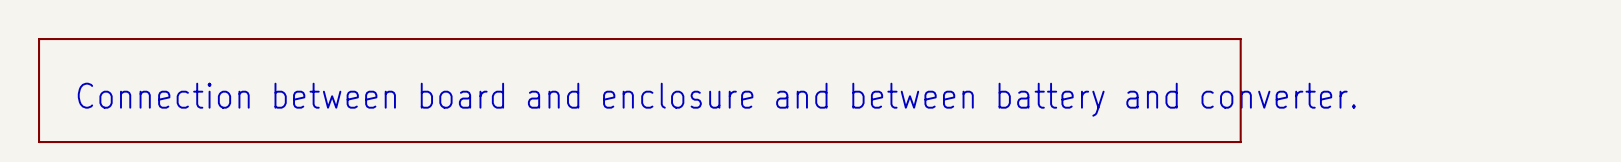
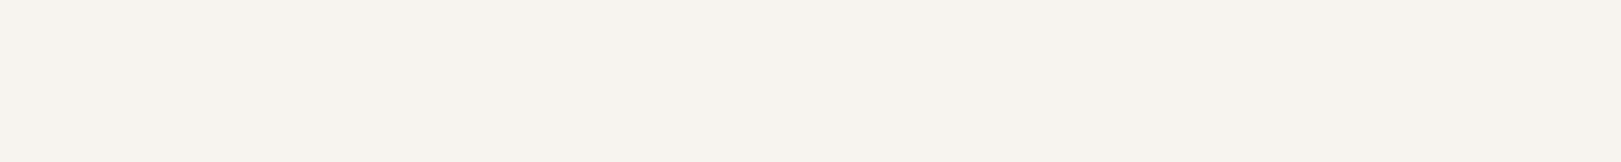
line: (39, 39) (39, 142) (1240, 142) (1240, 39) (39, 39) -> none
text: Connection between board and enclosure and between battery and converter. (716, 99) -> none

